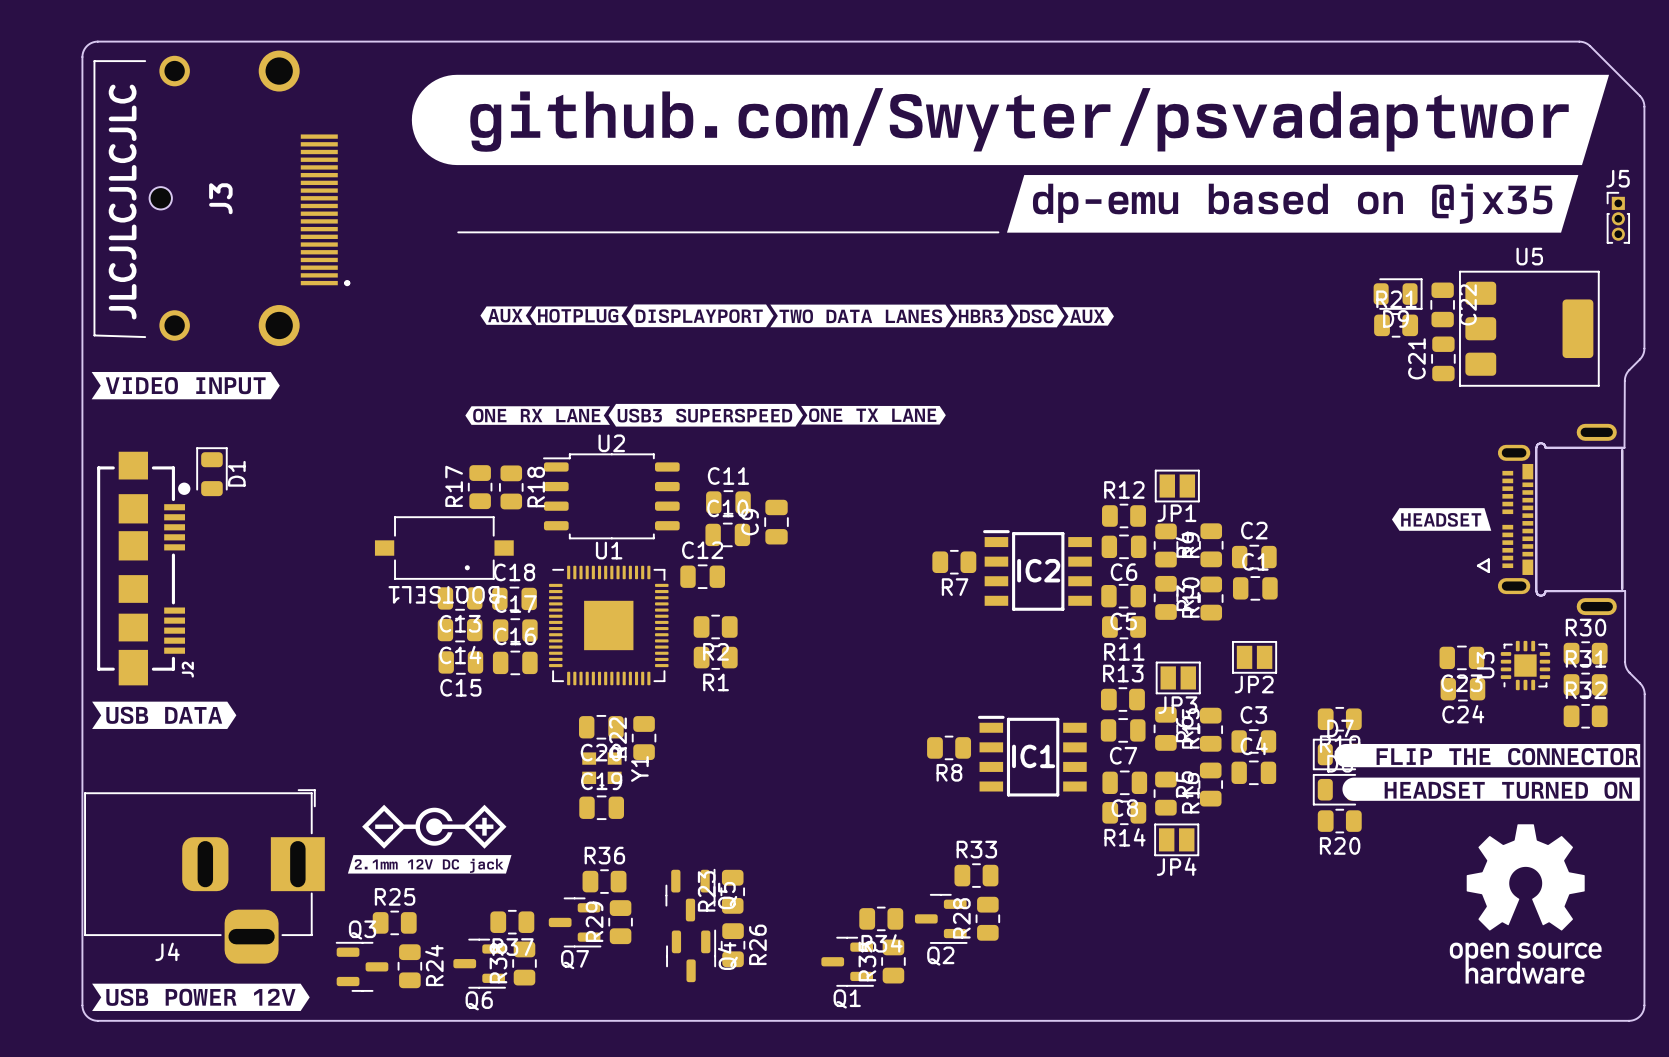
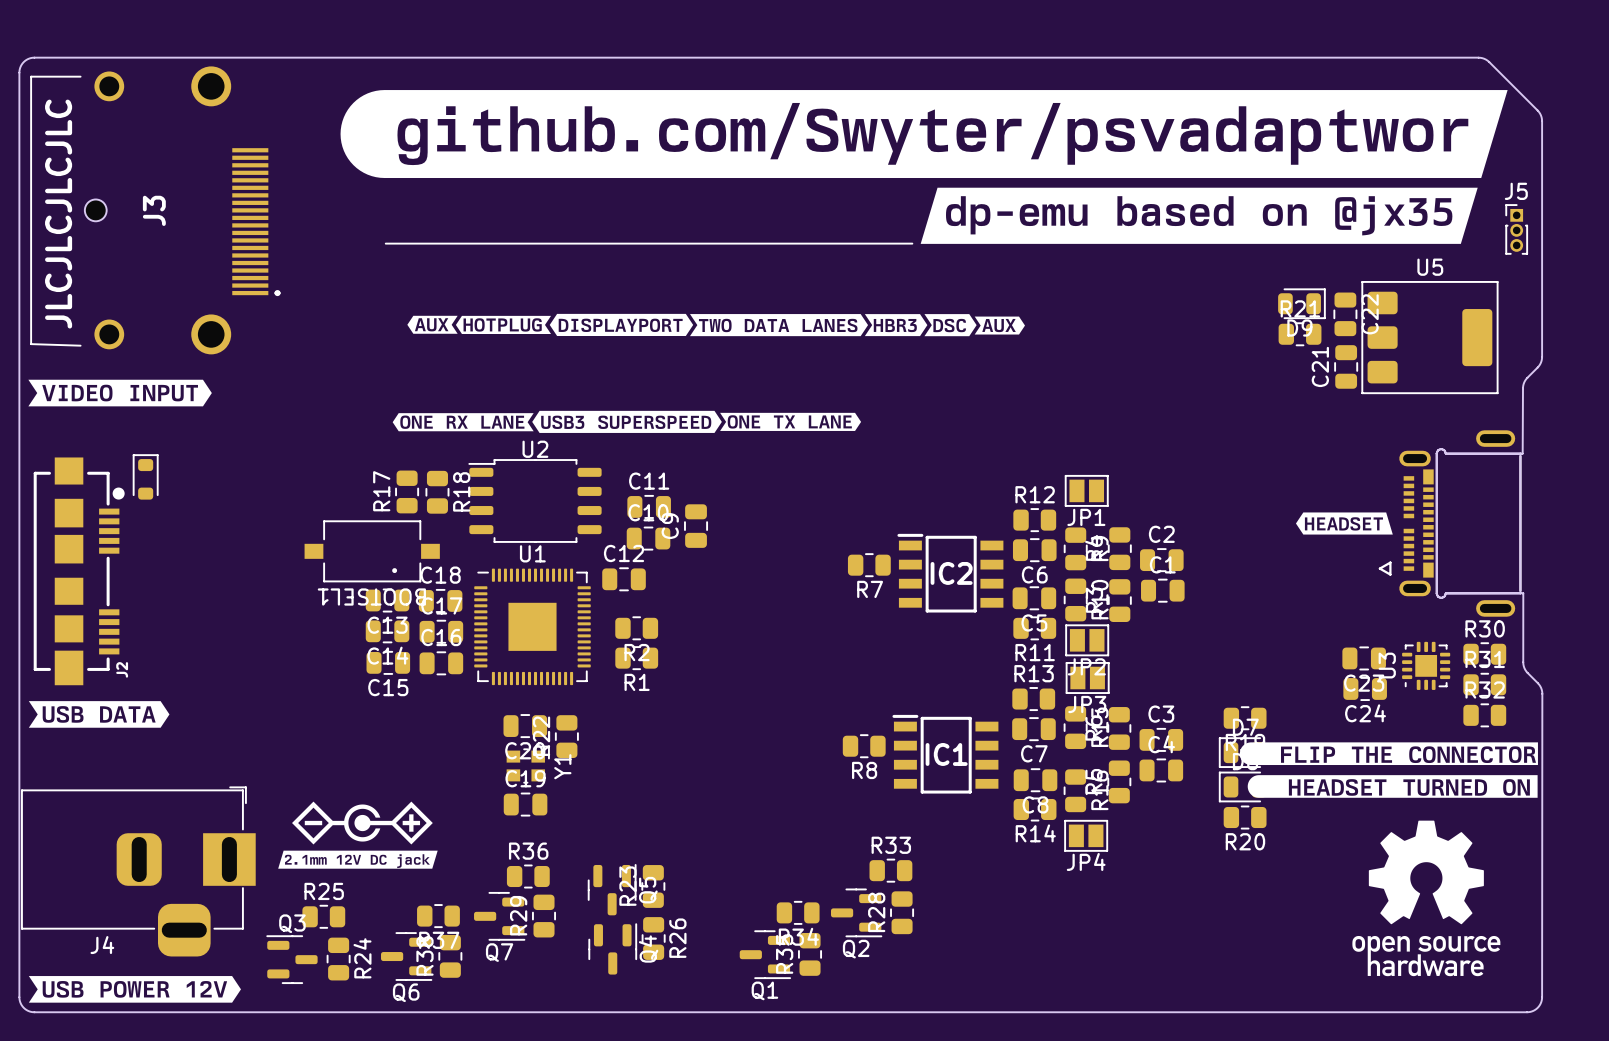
D1: (211, 471) -> none
part: none -> (145, 476)
JP2 position: (1254, 657) -> (1087, 640)

